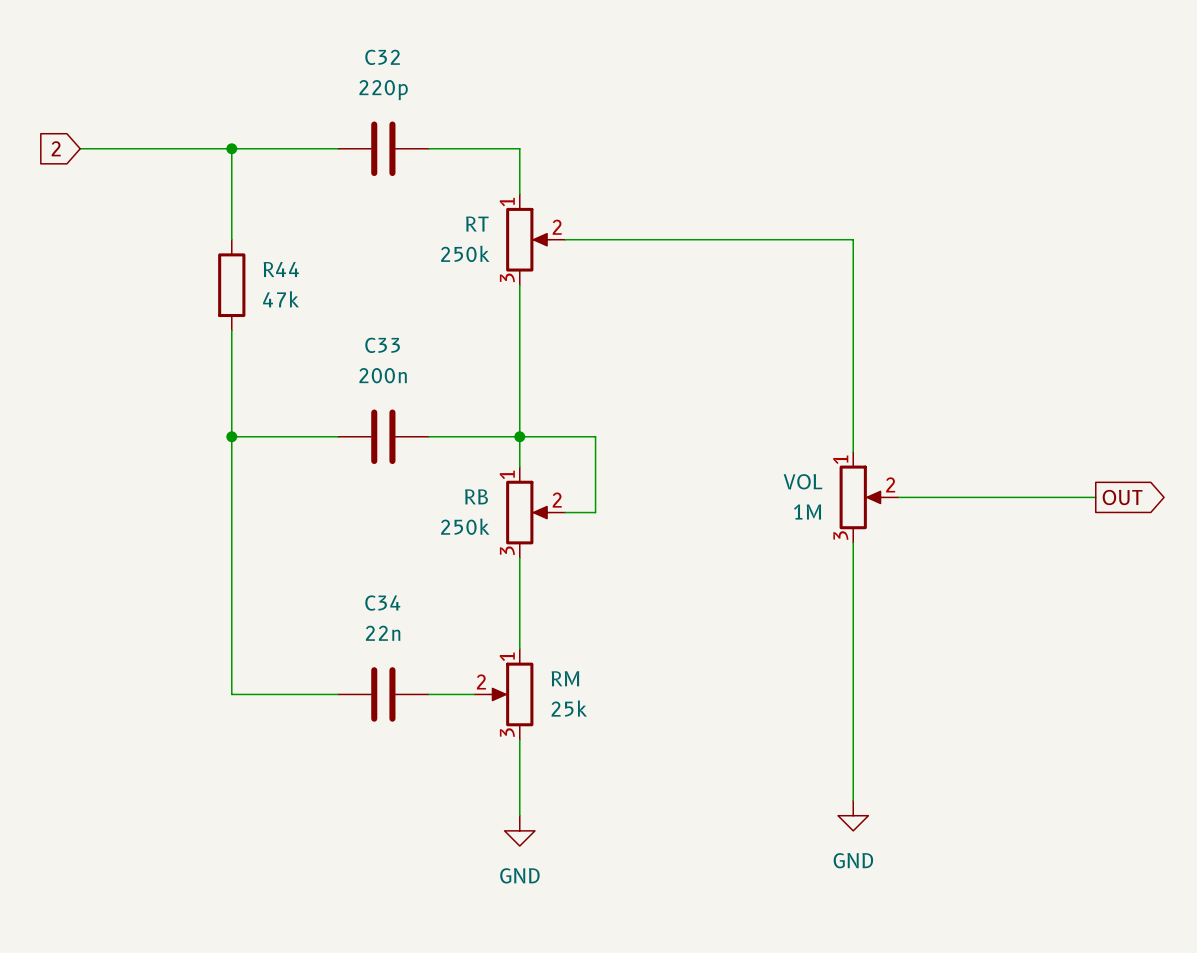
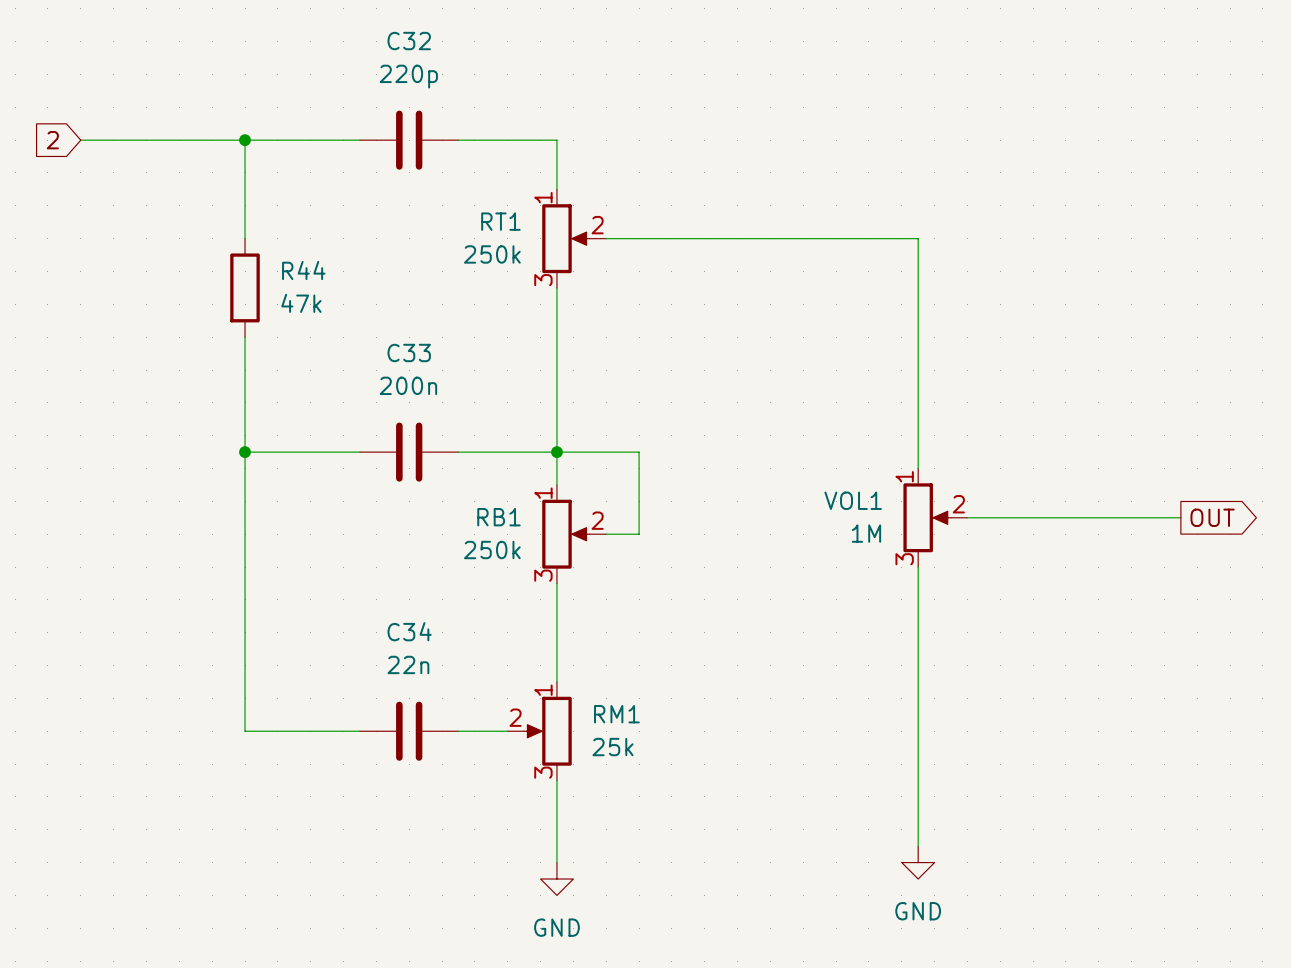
RT name: RT (477, 224) -> RT1 (500, 221)
VOL name: VOL (803, 481) -> VOL1 (853, 500)
RB name: RB (476, 496) -> RB1 (498, 517)
RM name: RM (565, 678) -> RM1 (616, 714)

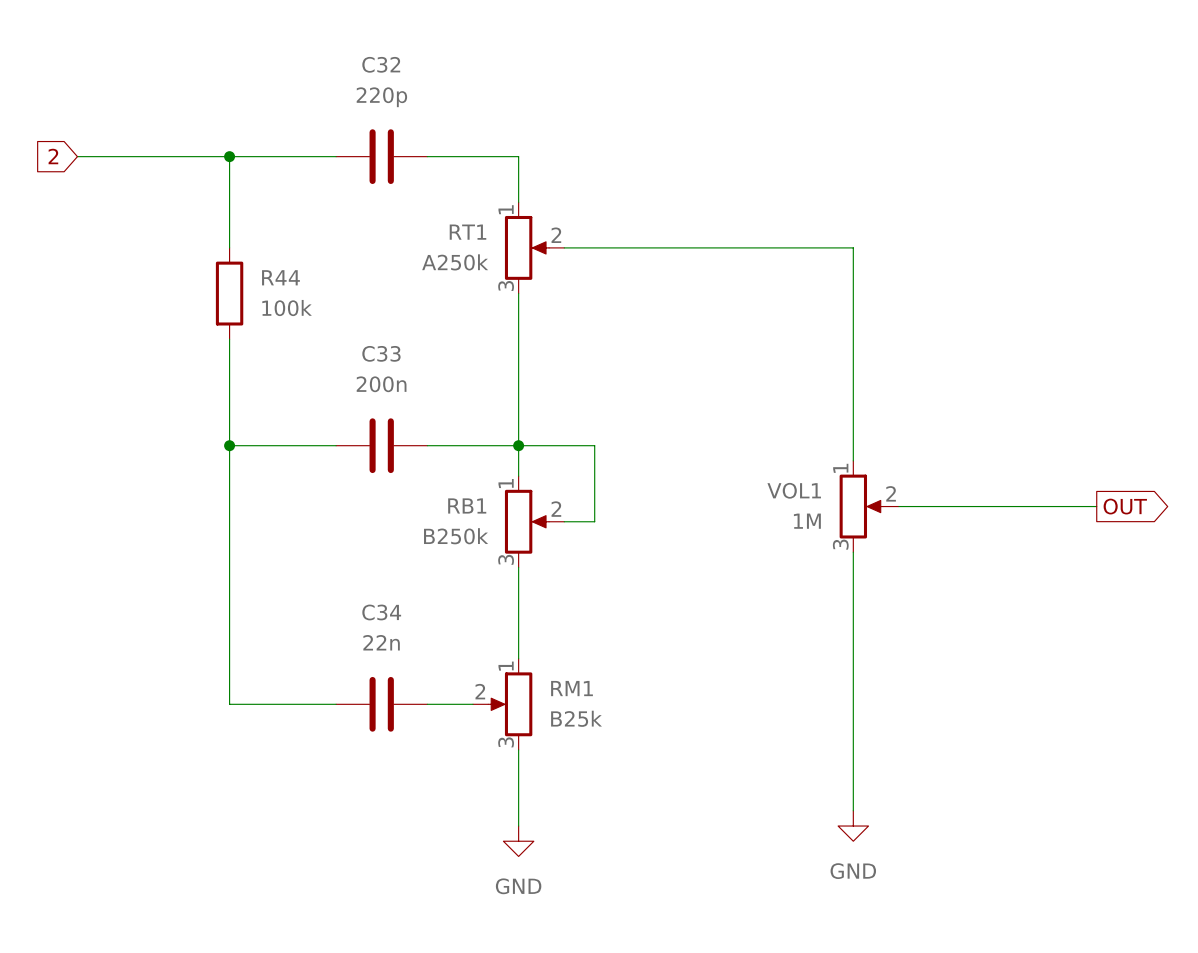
RT1 value: 250k (492, 254) -> A250k (455, 262)
R44 value: 47k (301, 303) -> 100k (287, 308)
RB1 value: 250k (492, 550) -> B250k (456, 536)
RM1 value: 25k (612, 747) -> B25k (576, 718)

